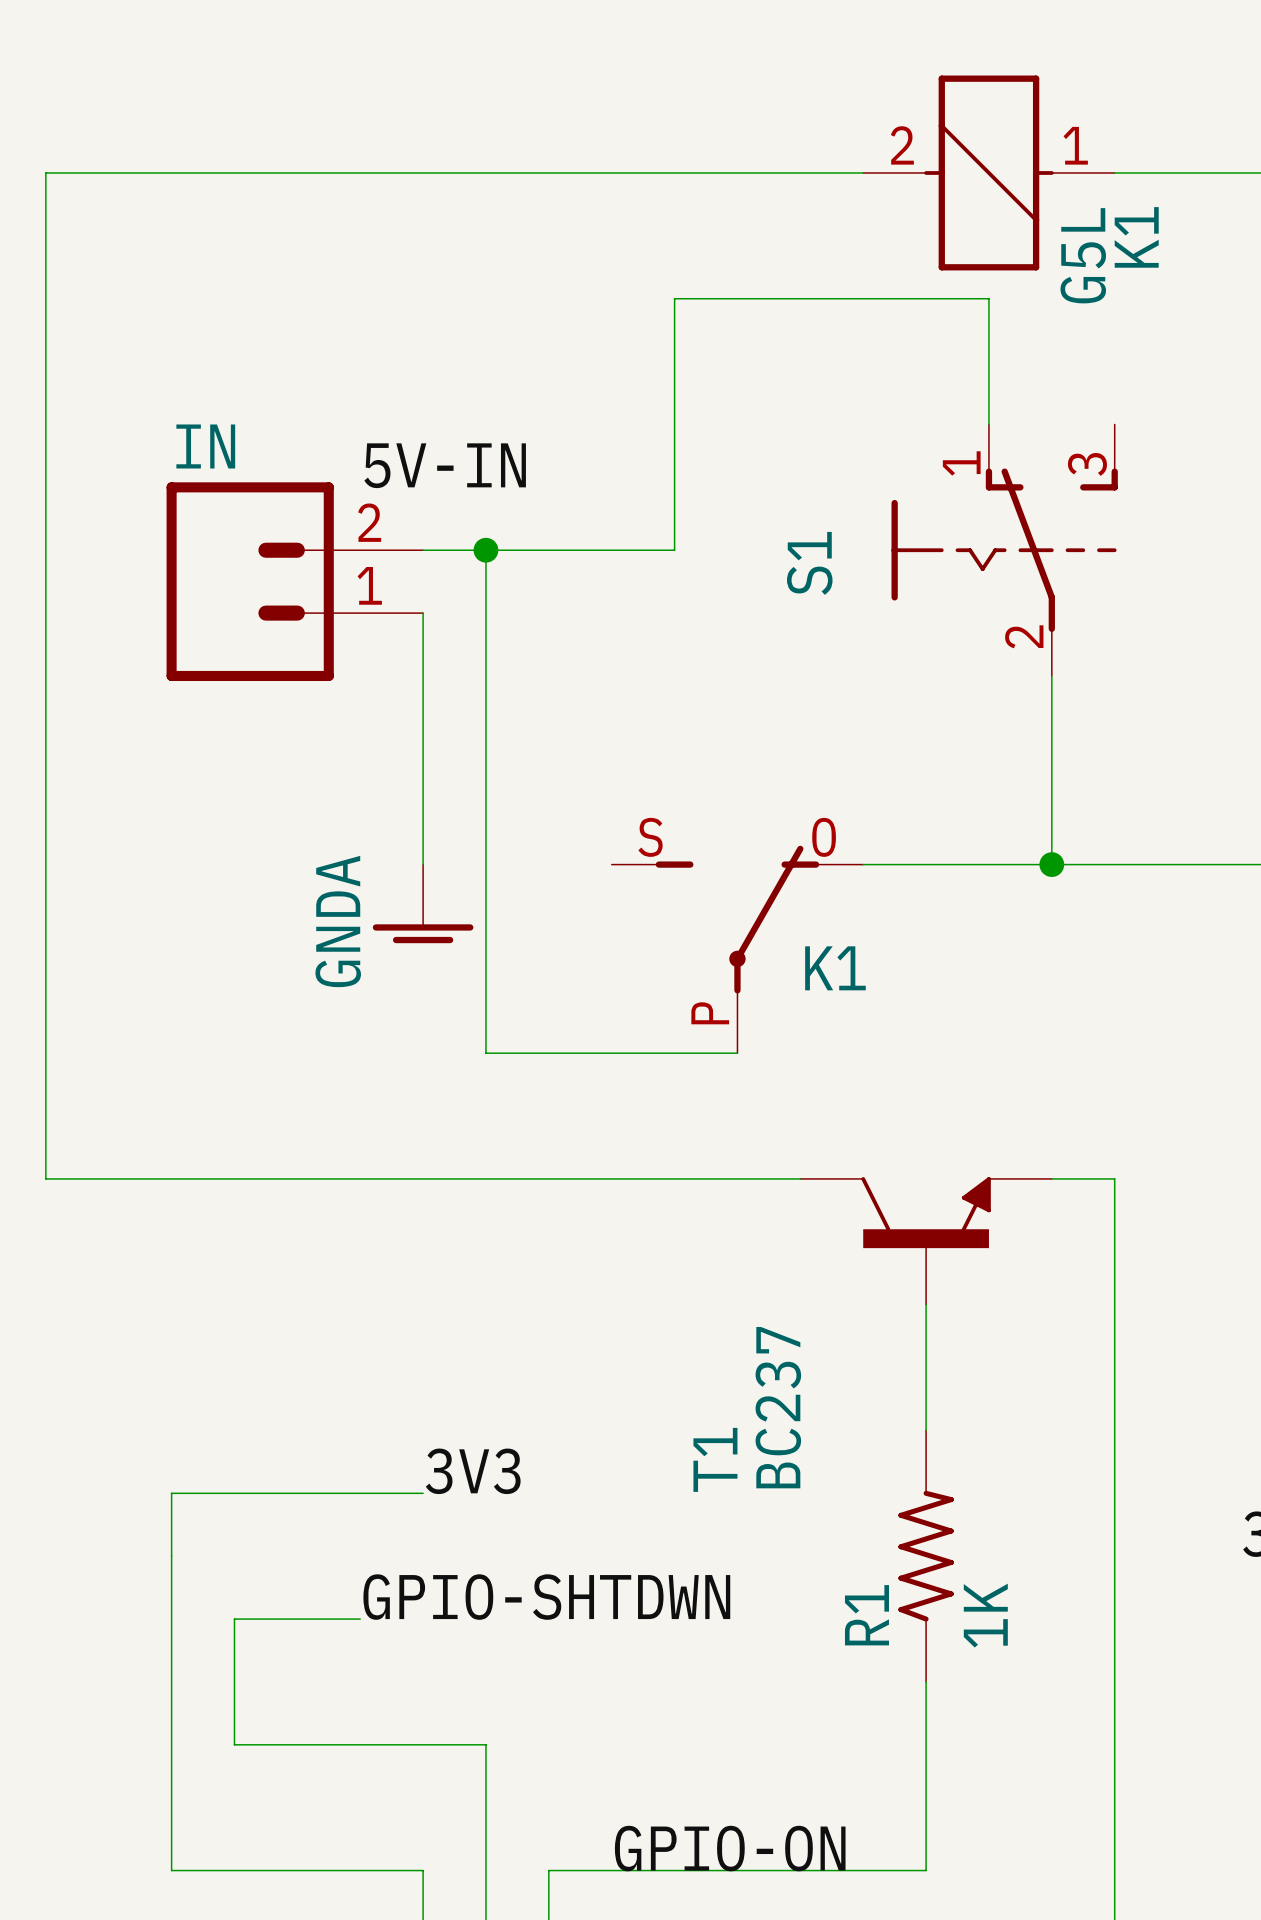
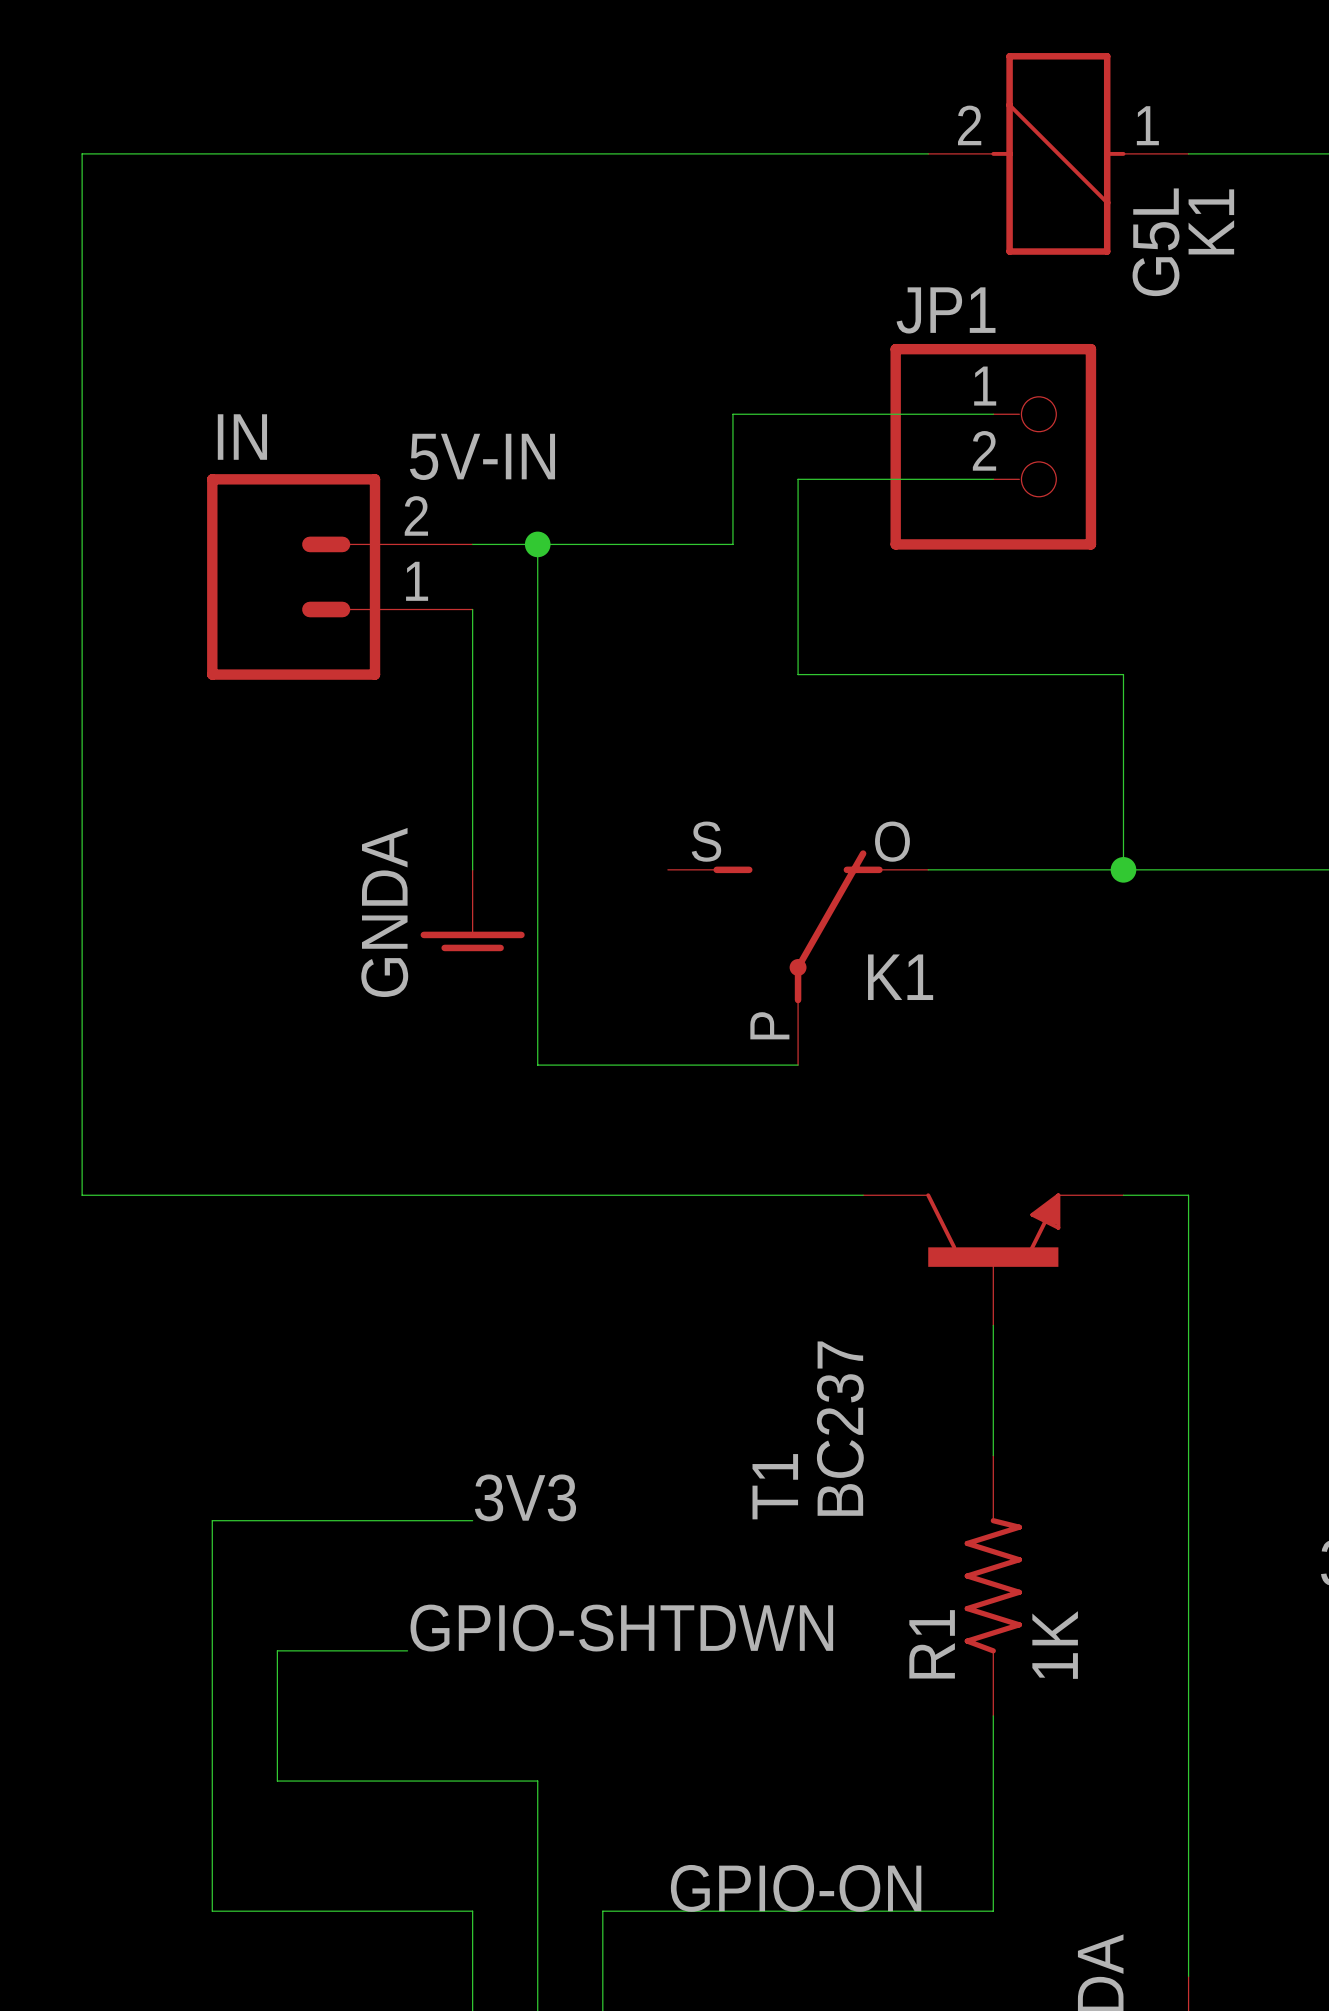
wire: (674, 424) (674, 298) (988, 298) (988, 424) -> (732, 414) (993, 414)
JP1: none -> (993, 446)
wire: none -> (993, 479) (798, 479) (798, 674) (1123, 674)
S1: (1004, 550) -> none

